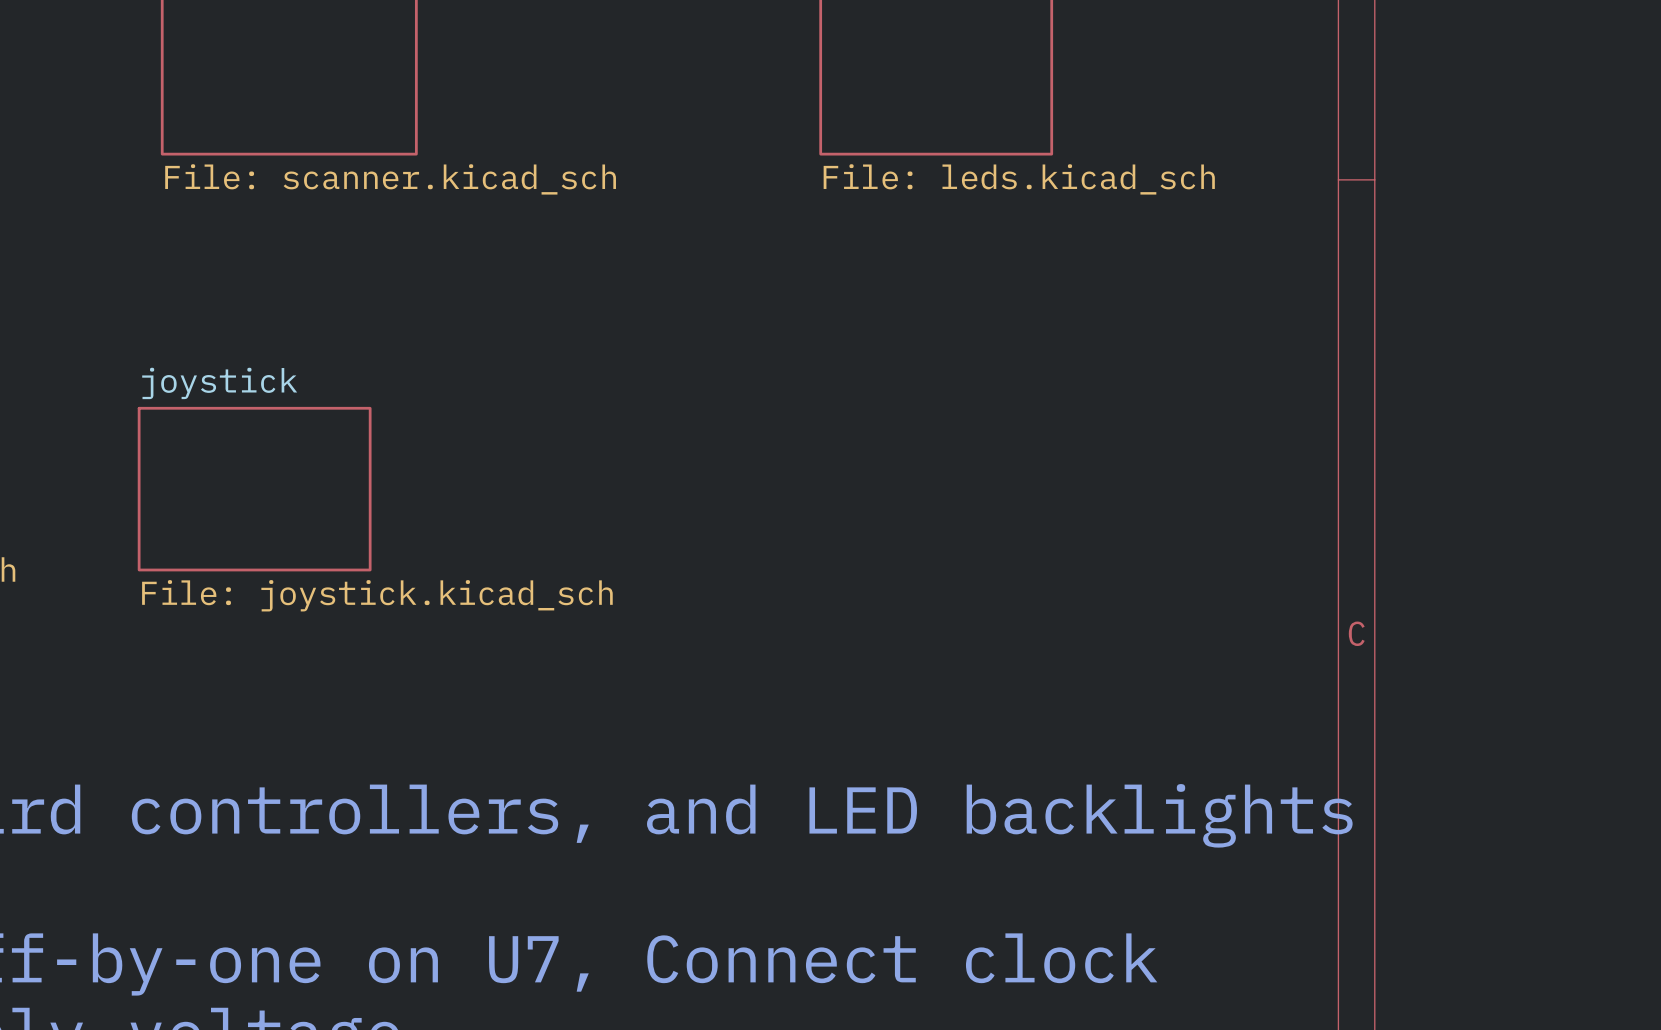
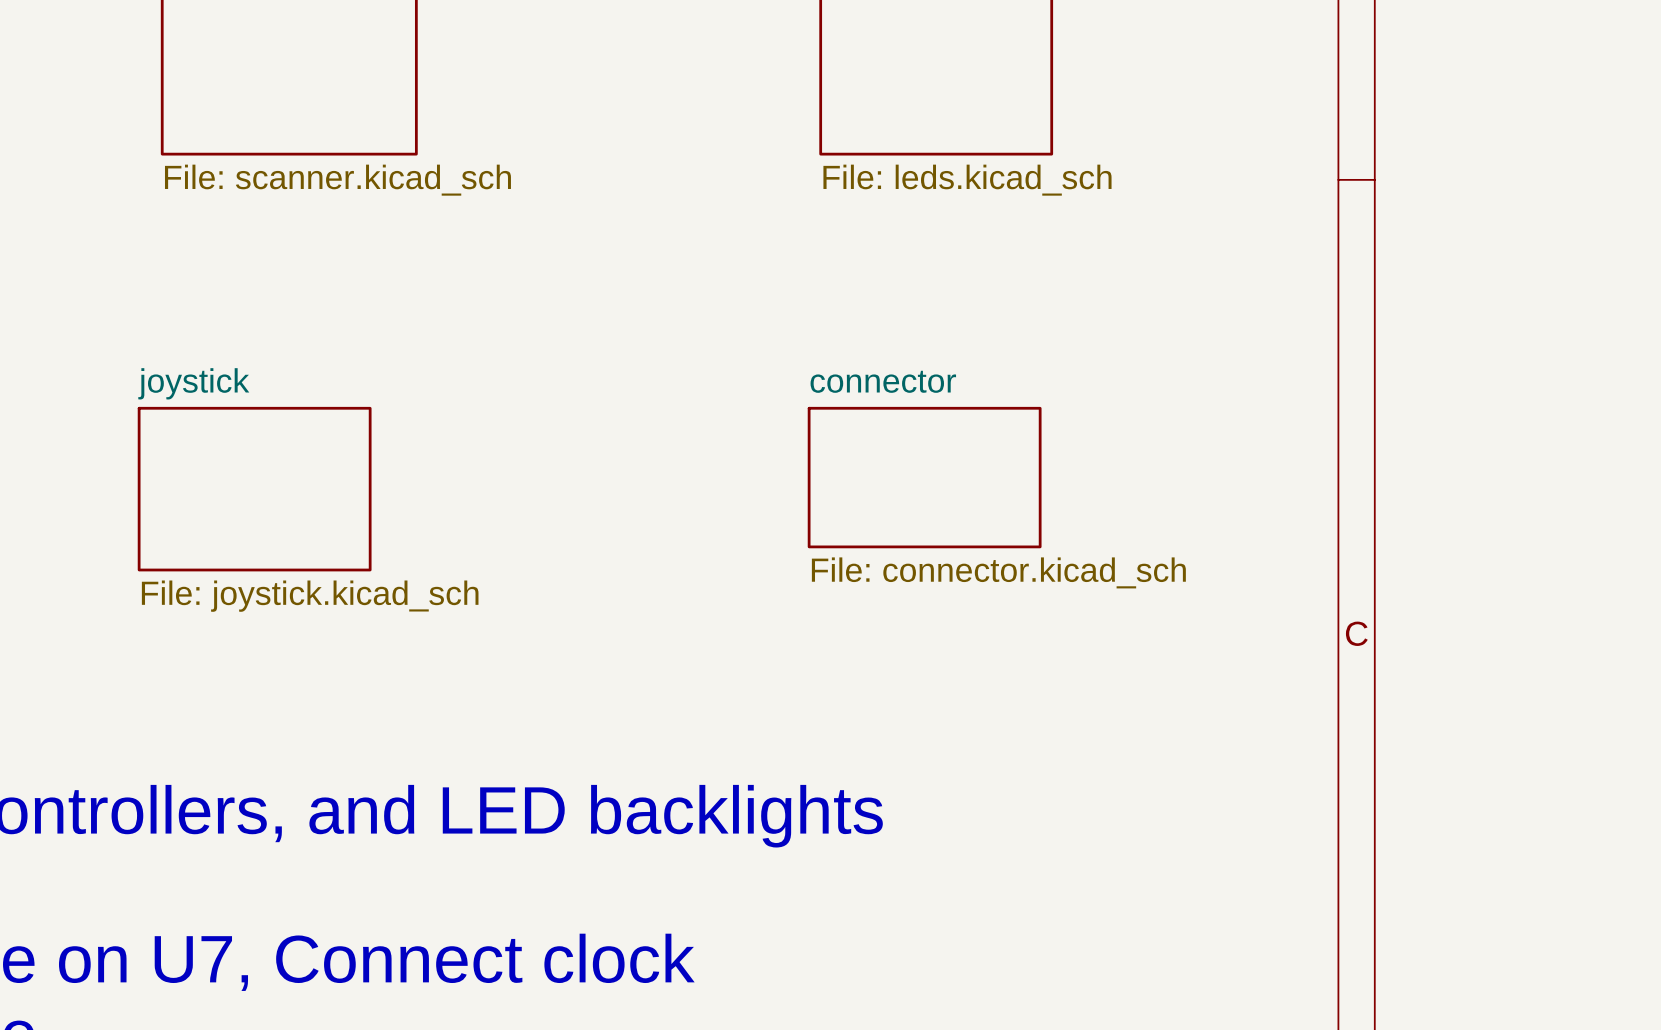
sheet connector: none -> File: connector.kicad_sch (924, 477)

